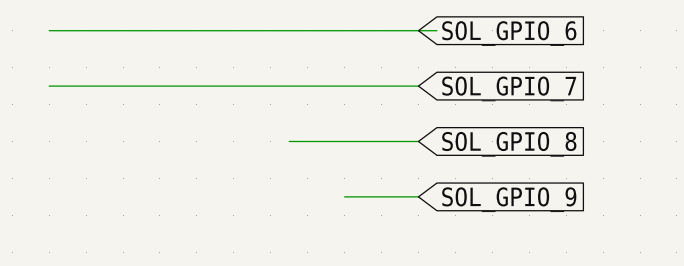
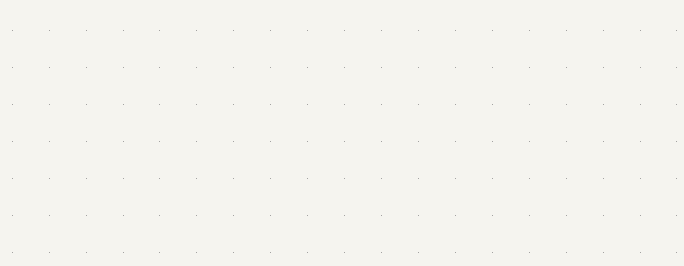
wire: (49, 30) (436, 30) -> none
global label: SOL_GPIO_6 (509, 33) -> none
wire: (49, 86) (418, 86) -> none
global label: SOL_GPIO_7 (509, 88) -> none
wire: (289, 141) (418, 141) -> none
global label: SOL_GPIO_8 (509, 144) -> none
wire: (344, 196) (418, 196) -> none
global label: SOL_GPIO_9 (509, 199) -> none

